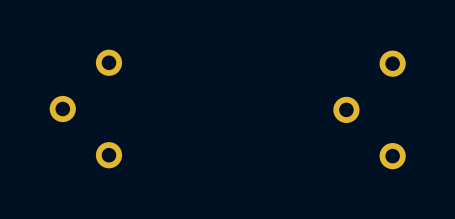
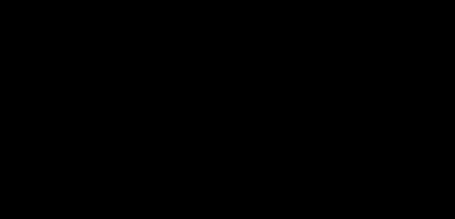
part: (85, 108) -> none
part: (369, 109) -> none

